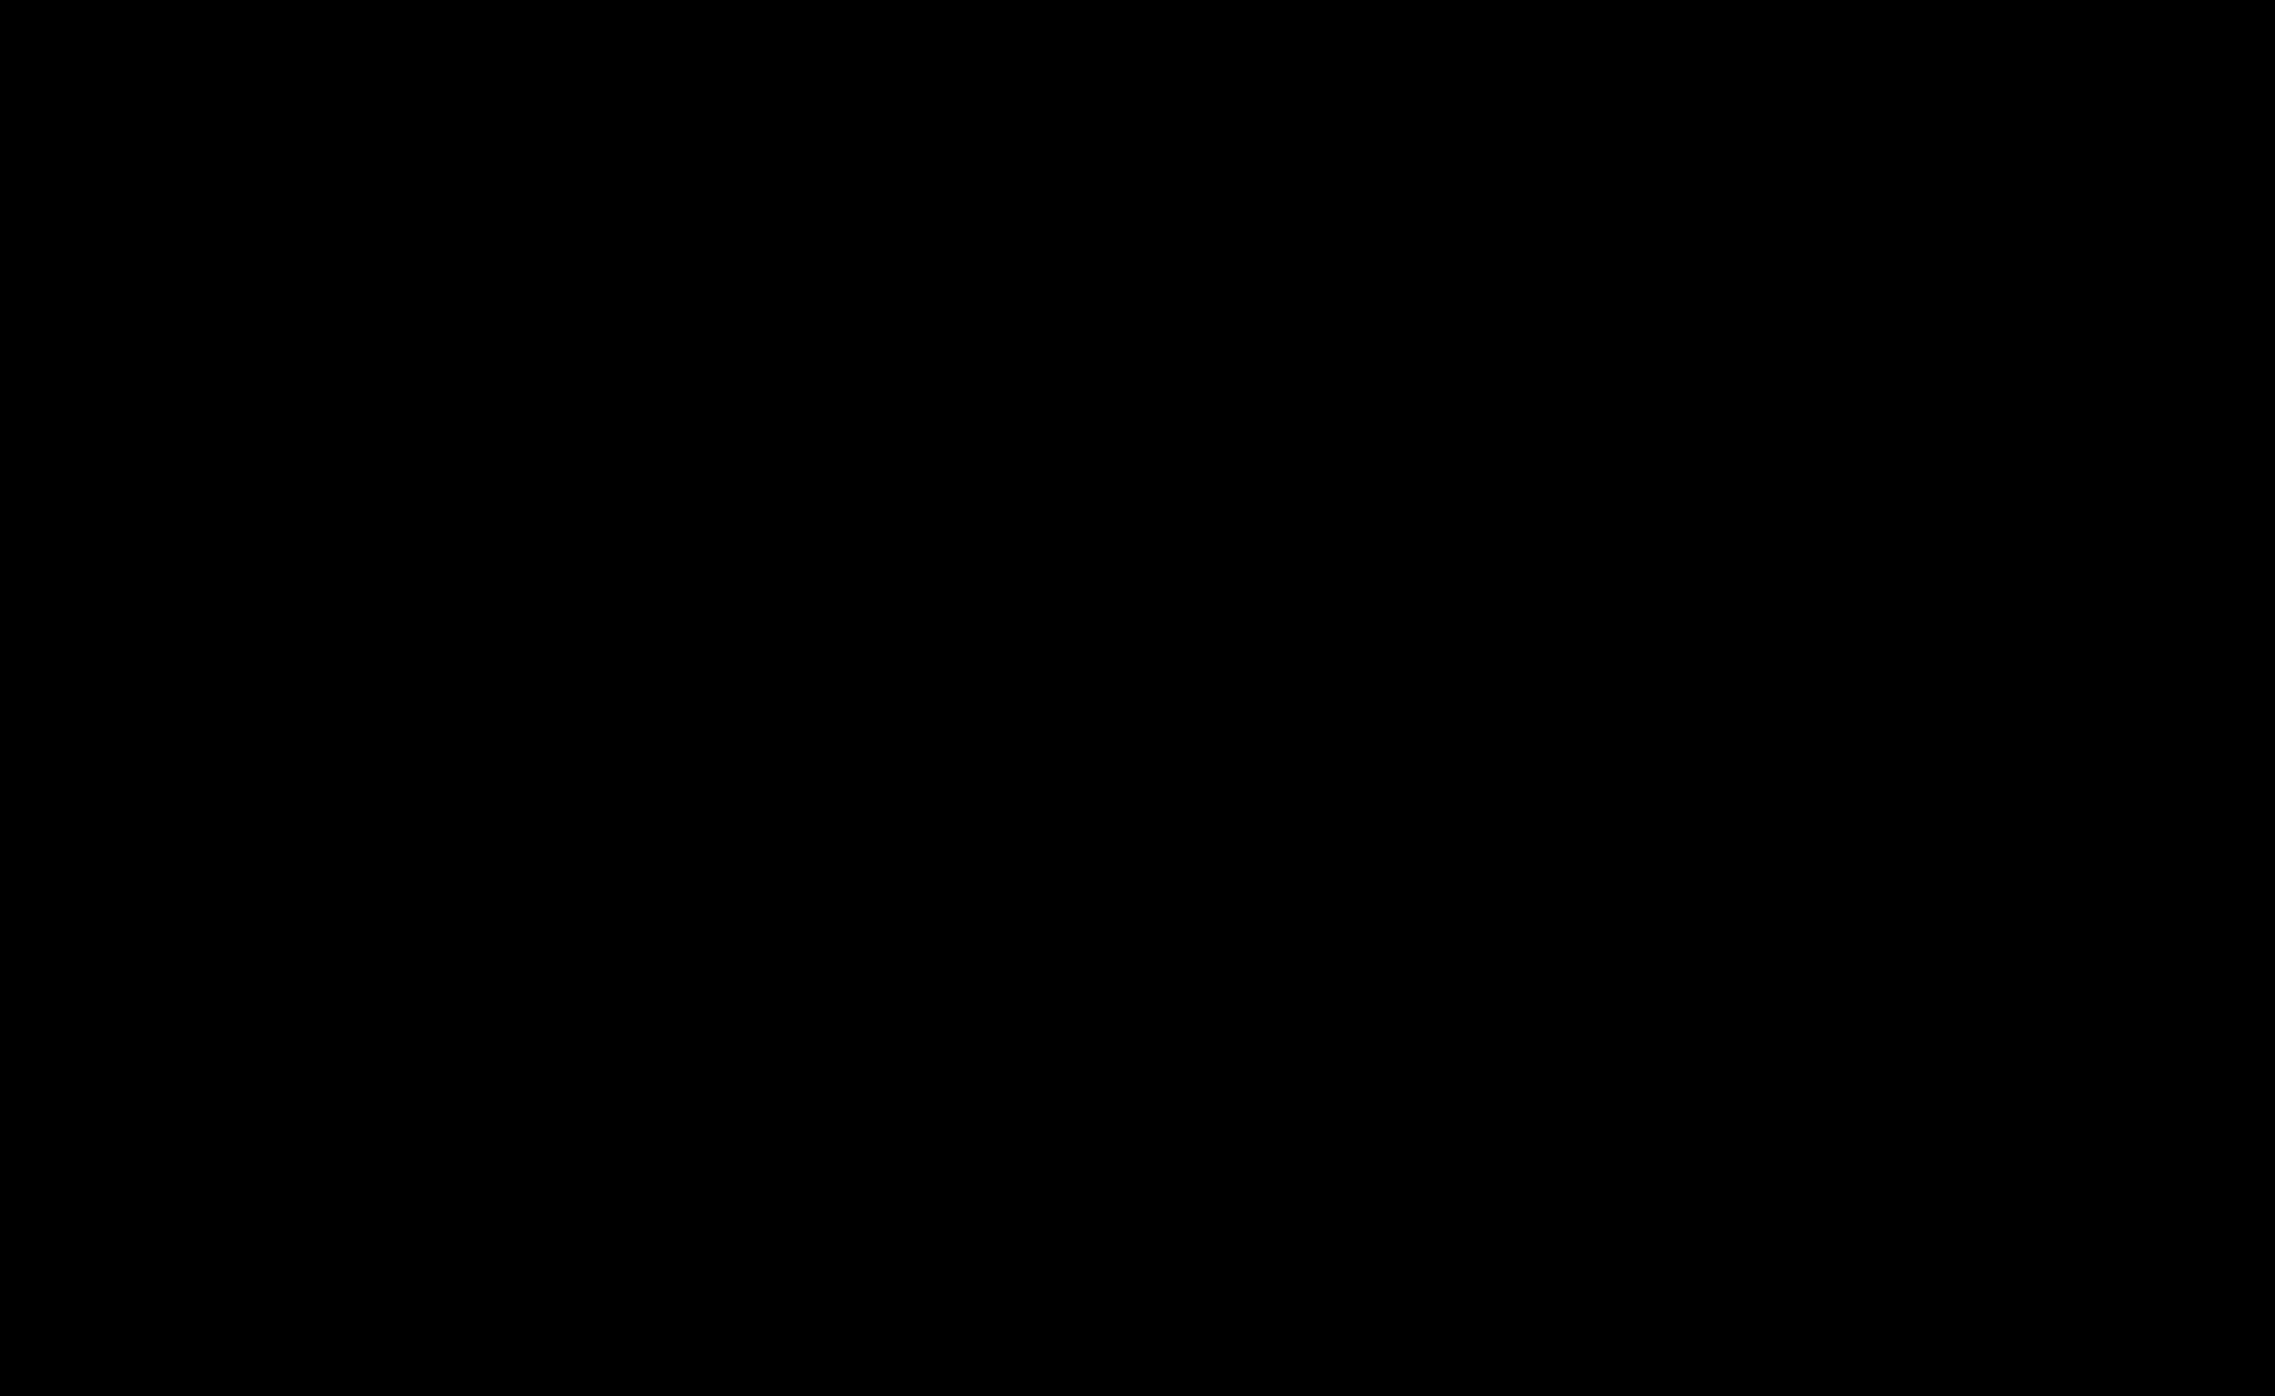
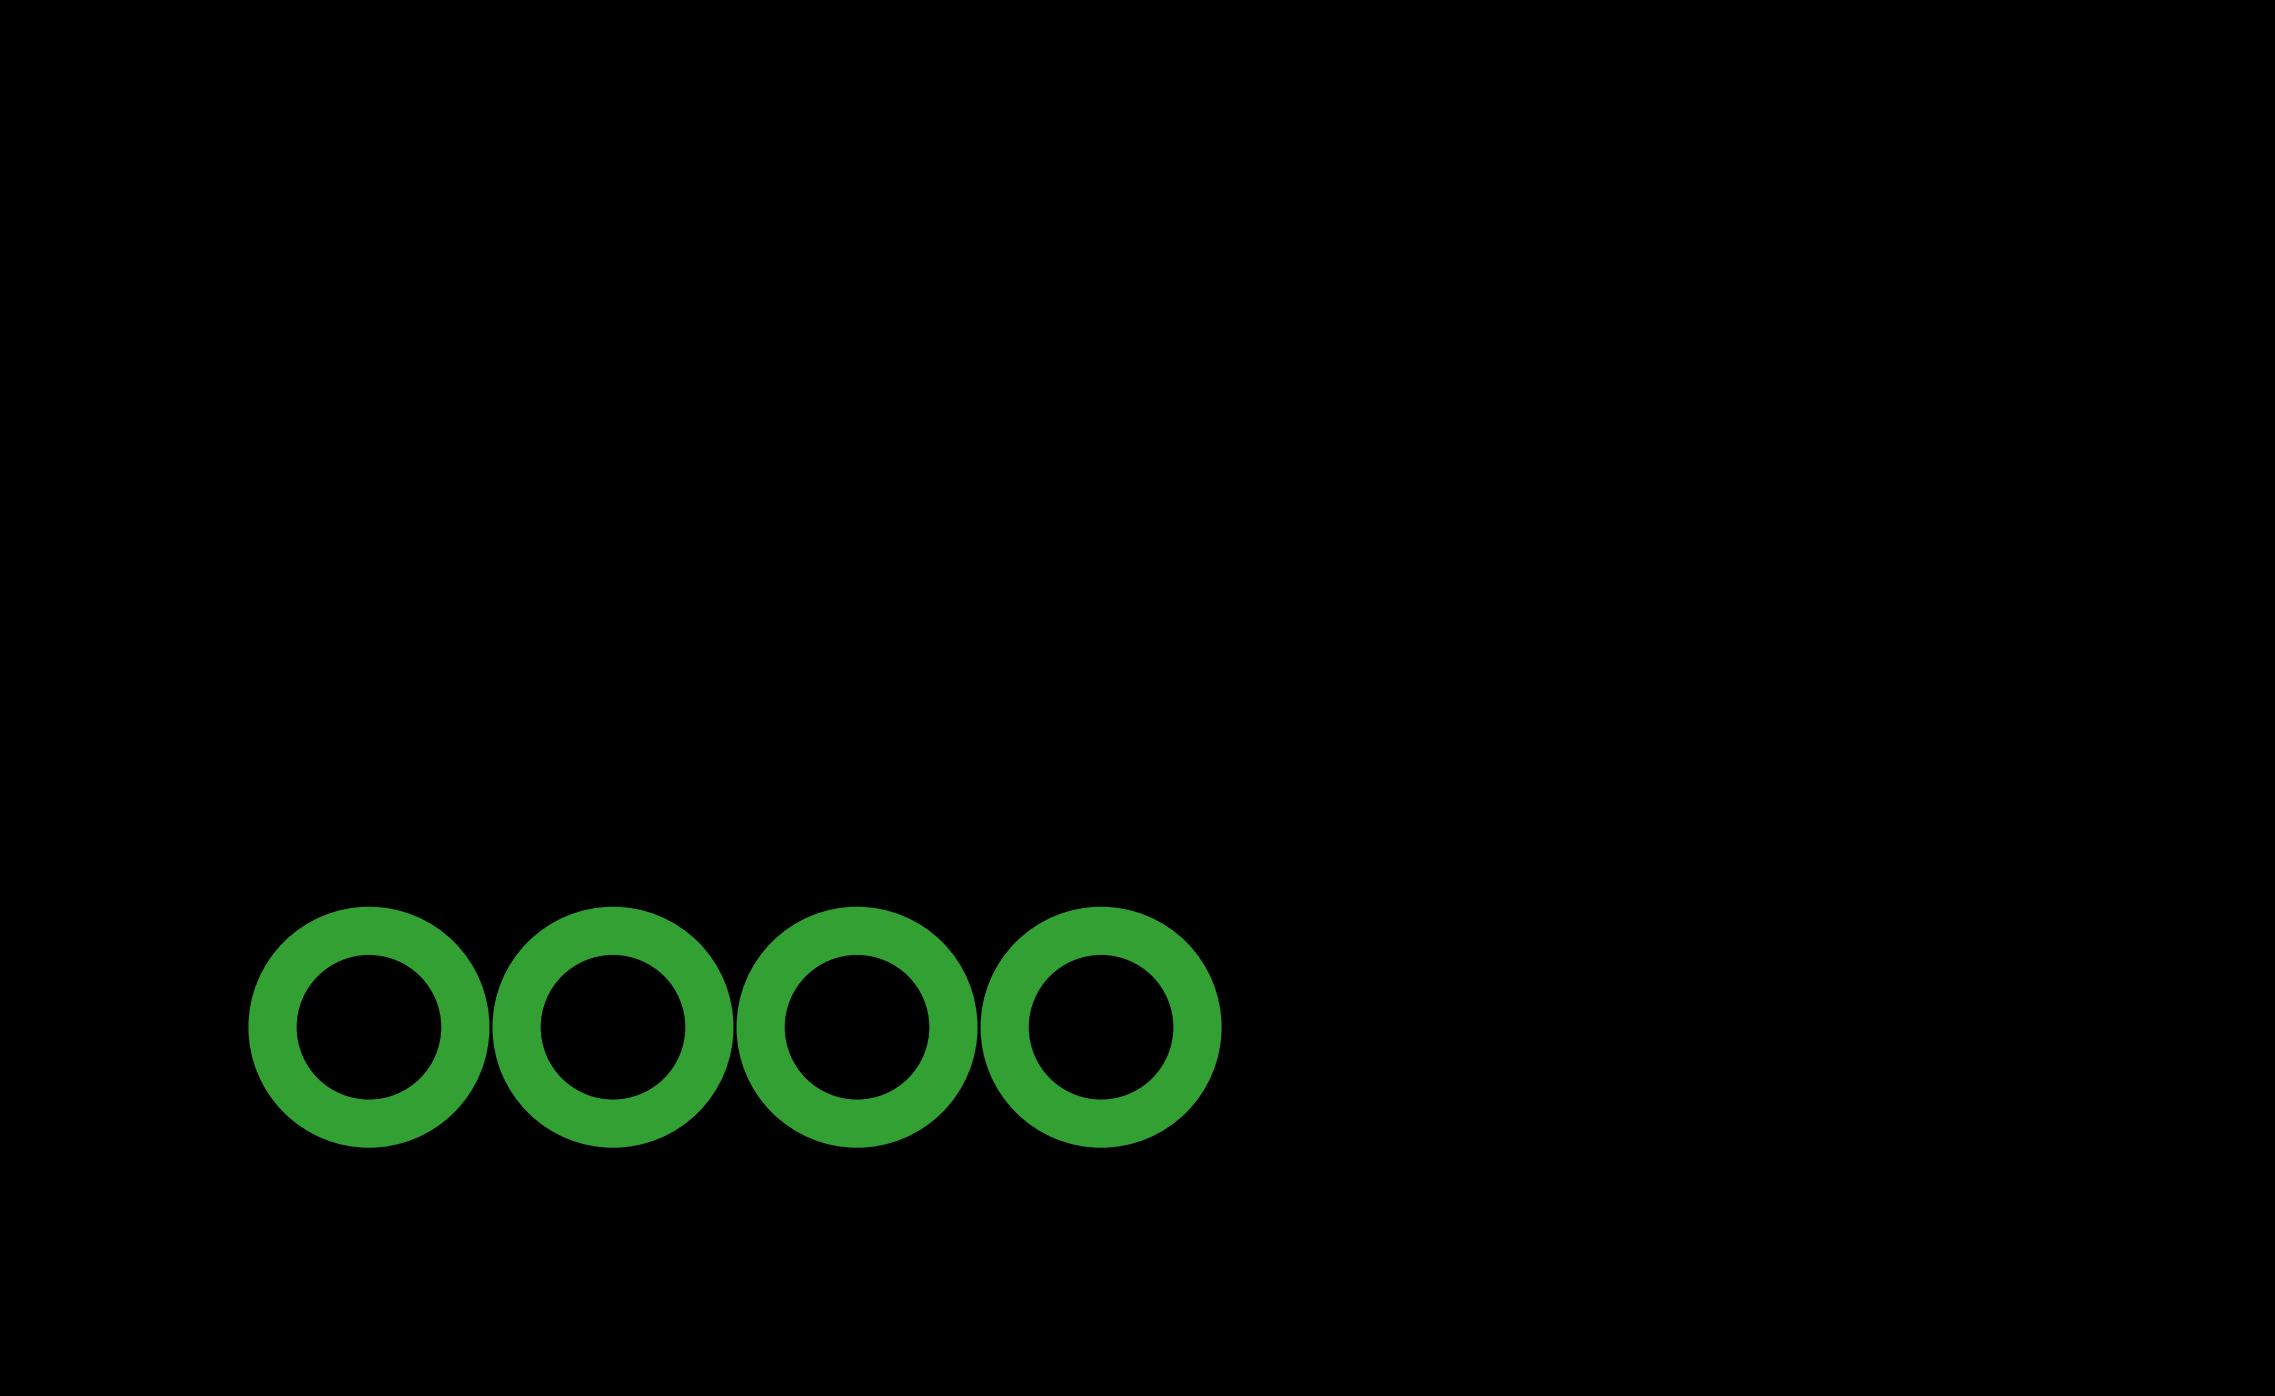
part: none -> (368, 1027)
part: none -> (612, 1027)
part: none -> (857, 1027)
part: none -> (1101, 1027)

